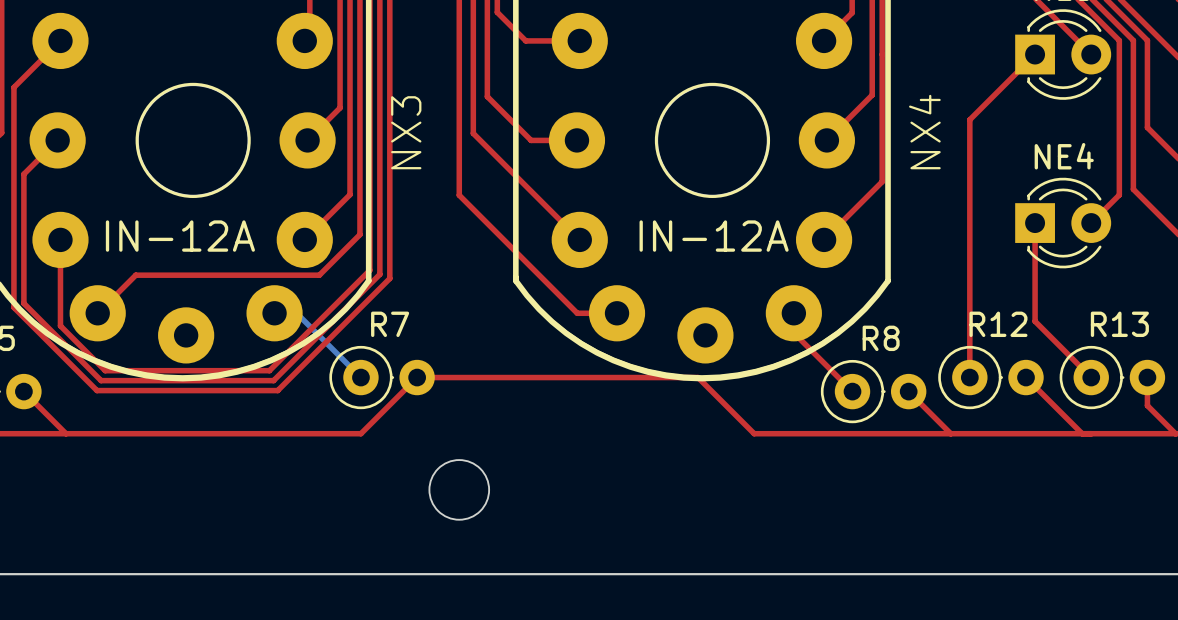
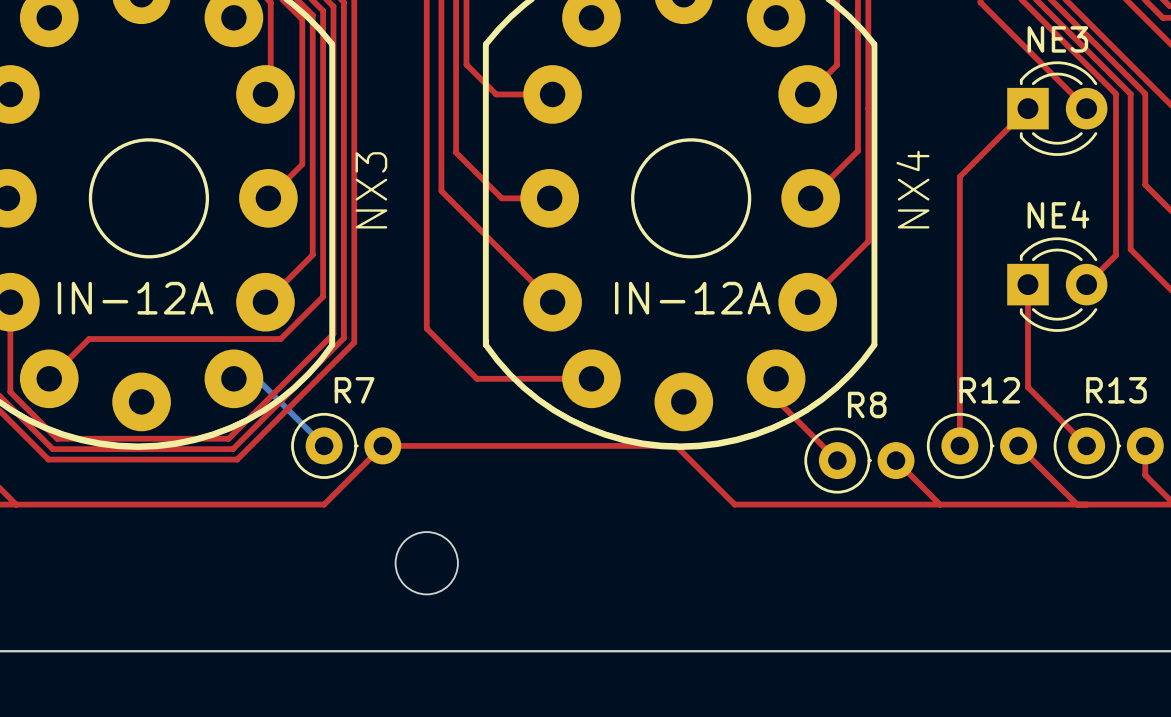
top track: (459, 195) (577, 313) -> (426, 255) (426, 328) (476, 378) (550, 378)

